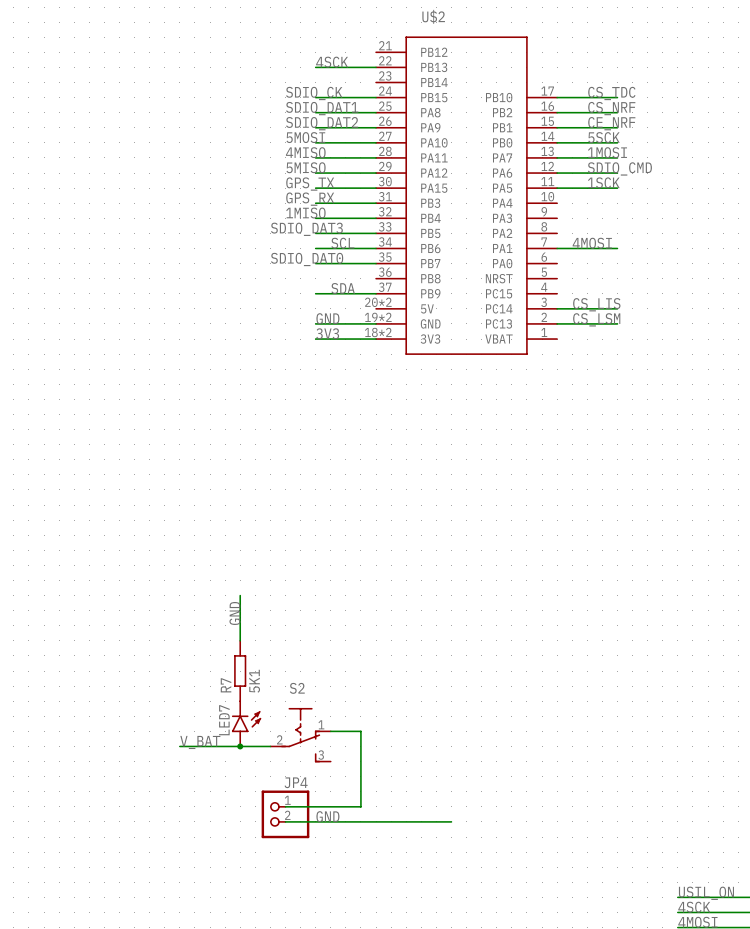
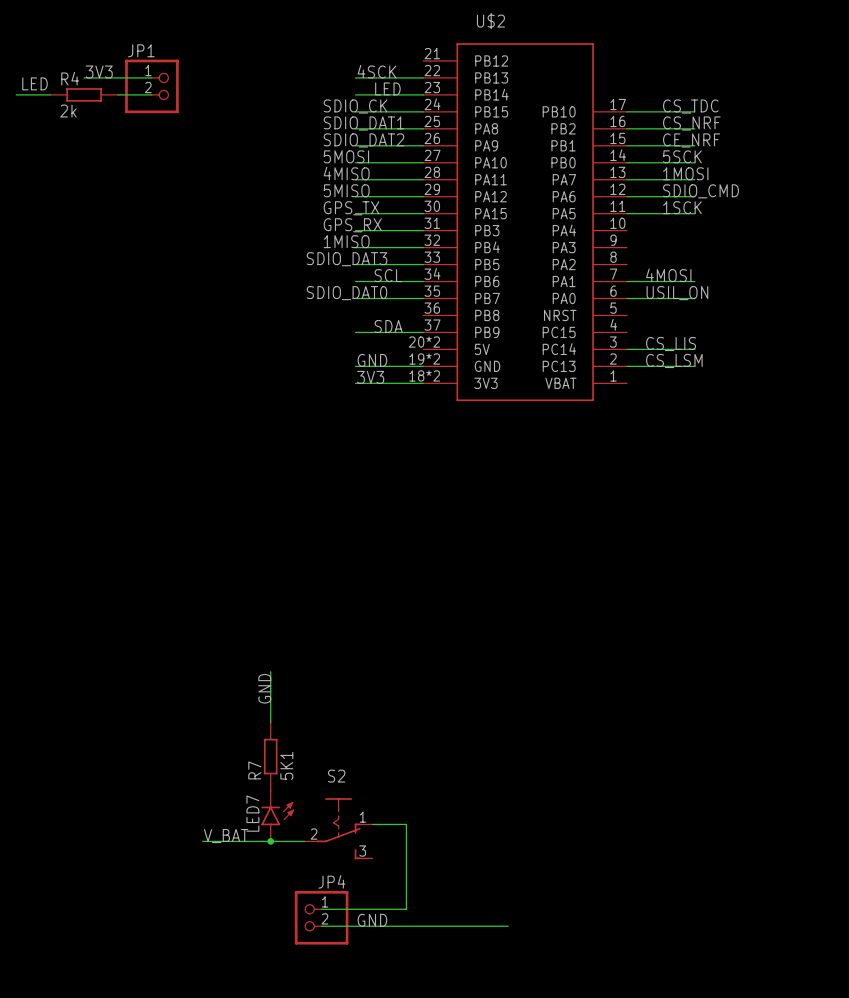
label: none -> 3V3 (99, 72)
wire: none -> (84, 77) (151, 77)
label: none -> LED (35, 83)
JP1: none -> (151, 86)
label: none -> LED (387, 88)
wire: none -> (16, 94) (50, 94)
R4: none -> 2k (84, 94)
wire: none -> (118, 94) (151, 94)
wire: none -> (355, 94) (423, 94)
label: none -> USIL_ON (677, 293)
wire: none -> (626, 298) (694, 298)

